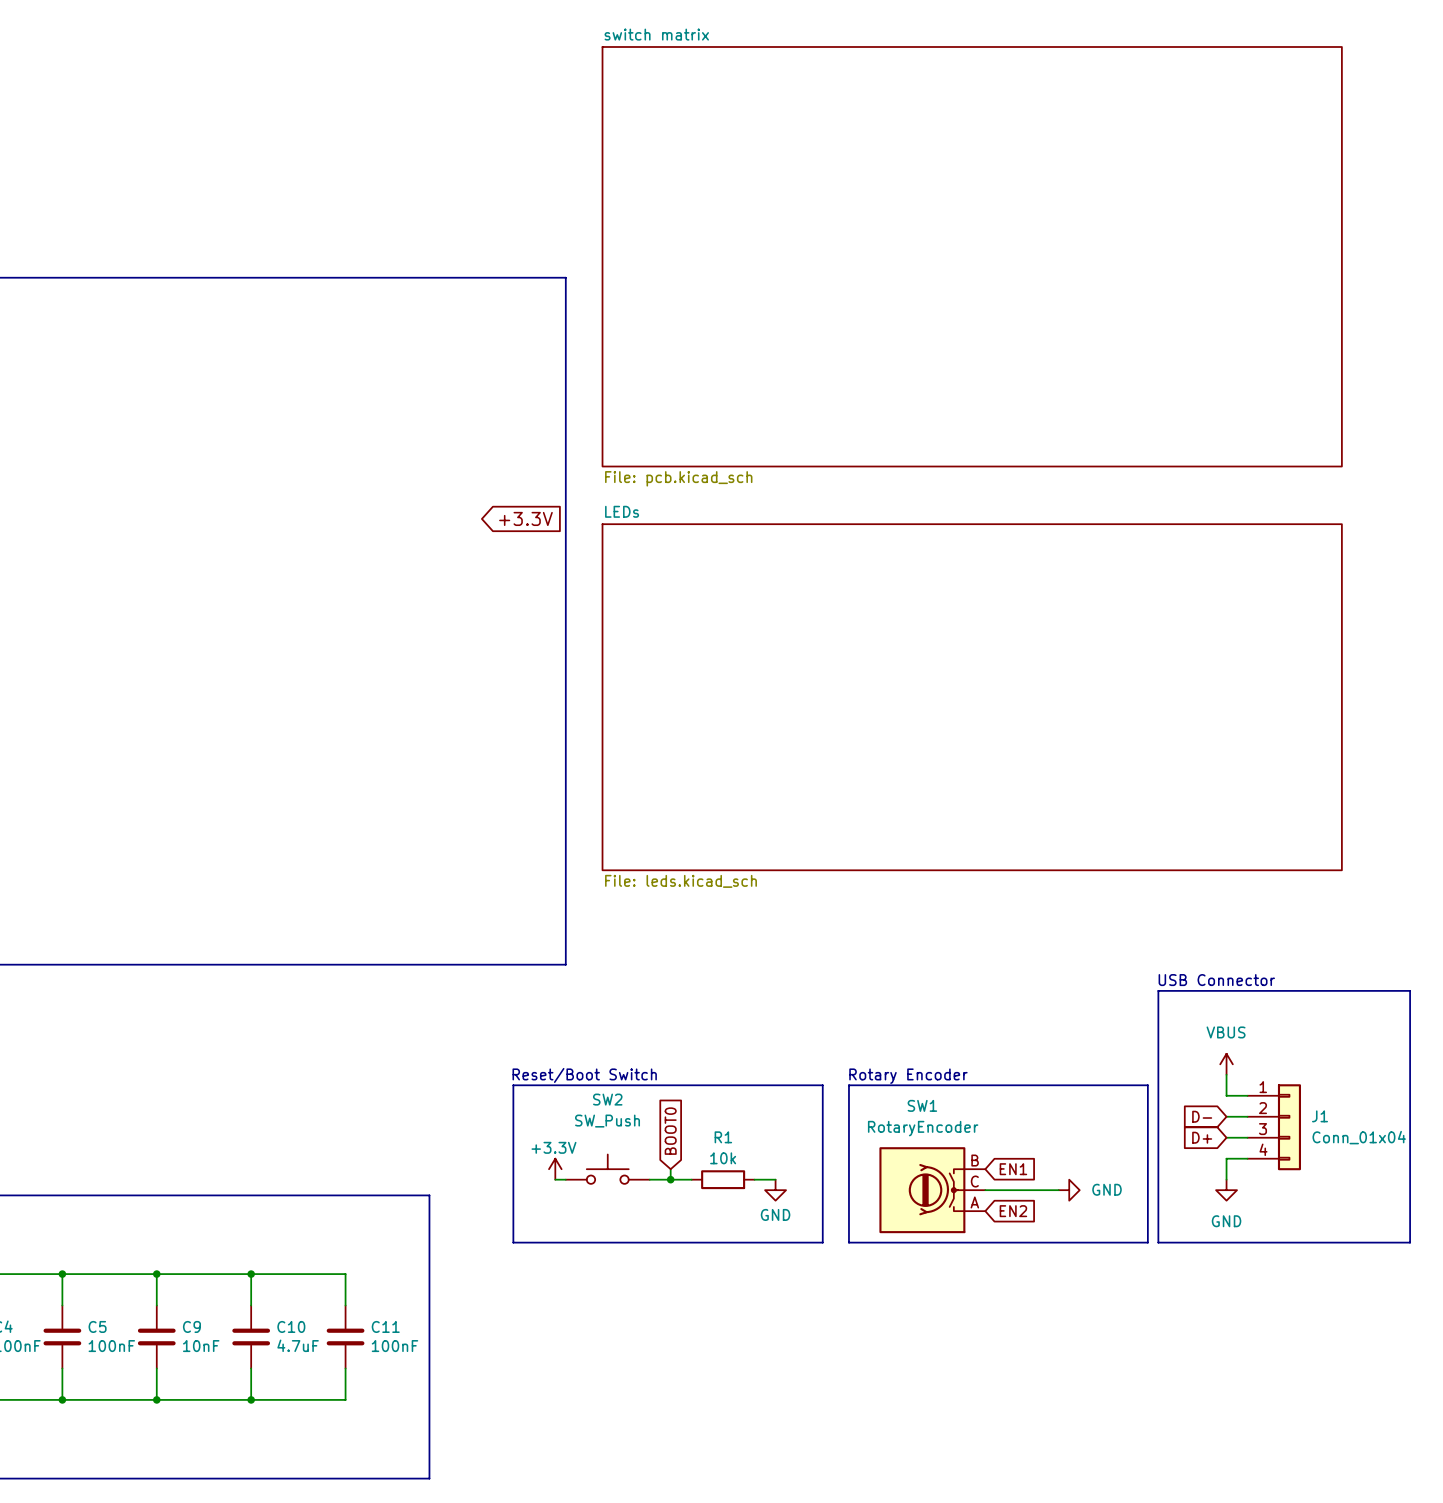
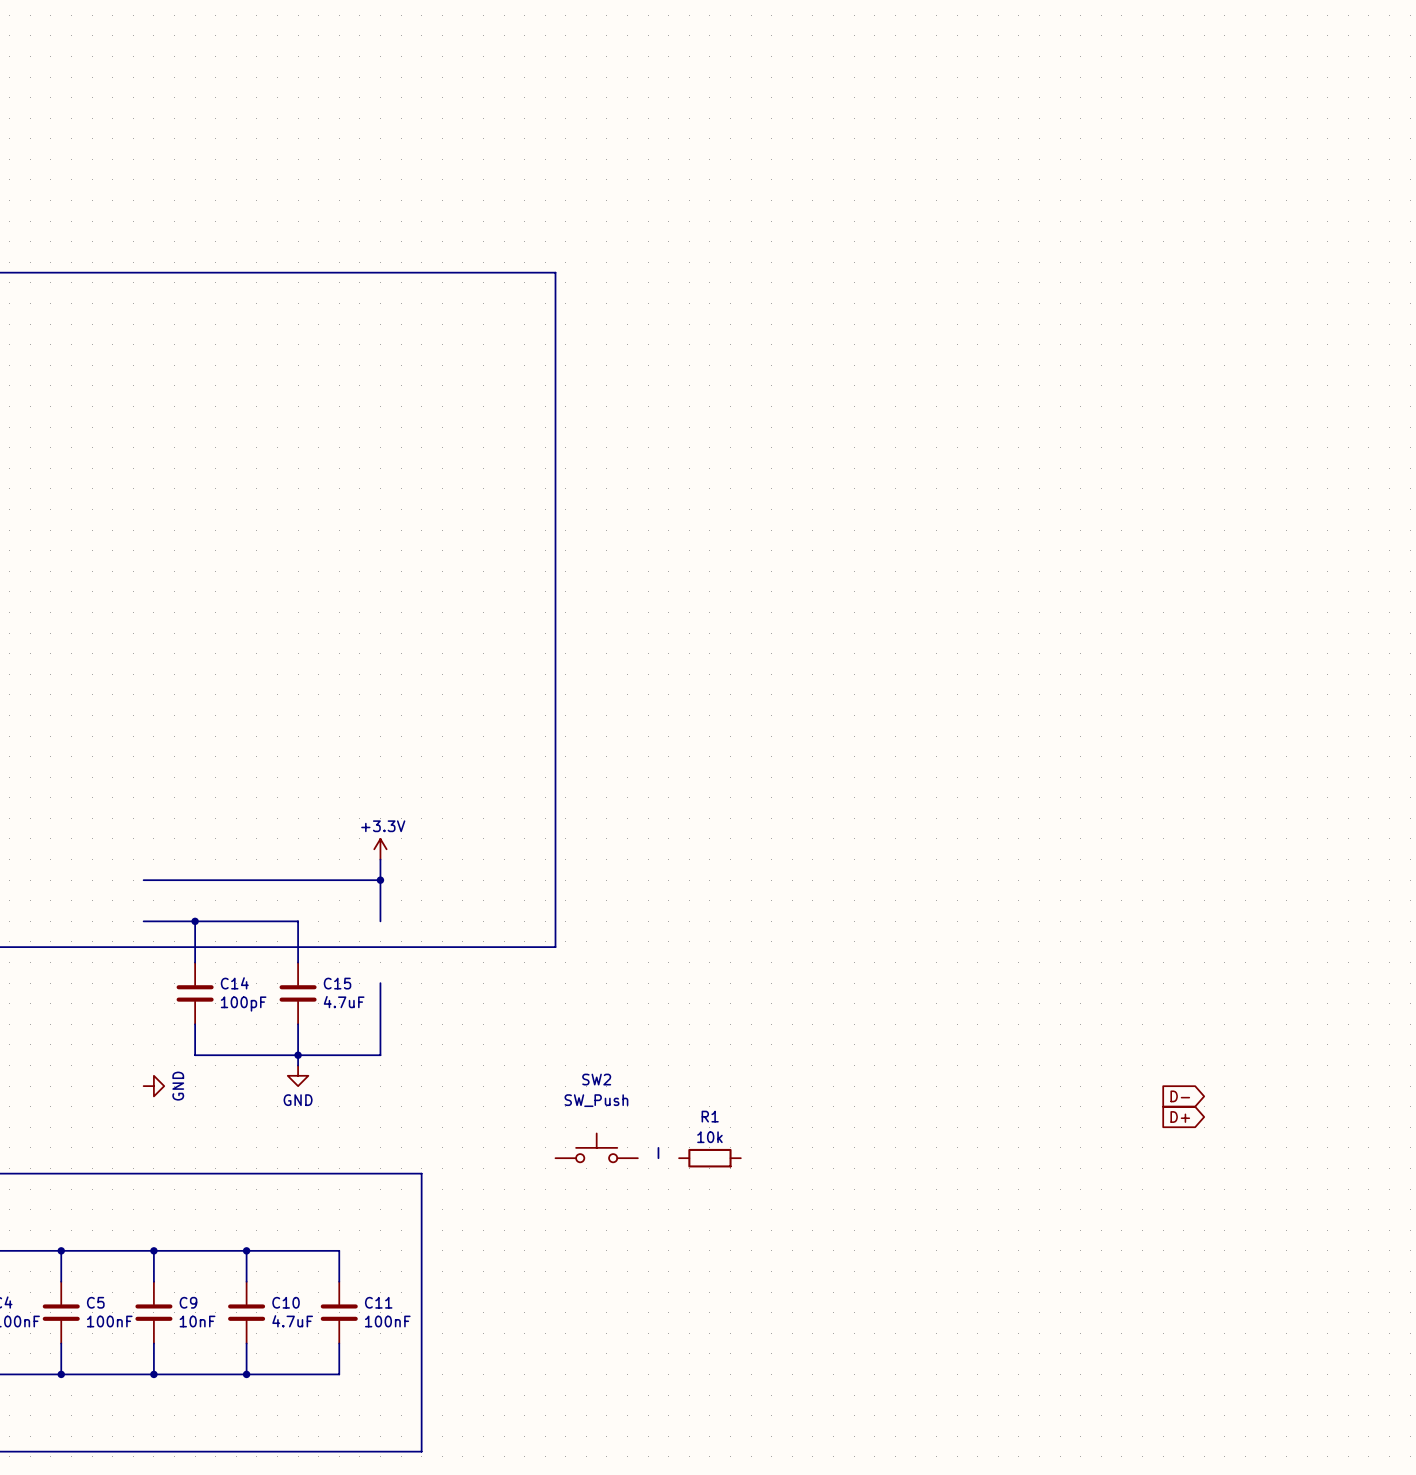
sheet switch matrix: File: pcb.kicad_sch (972, 256) -> none
global label: +3.3V (525, 518) -> none
sheet LEDs: File: leds.kicad_sch (972, 697) -> none
power symbol: none -> +3.3V (380, 849)
wire: none -> (380, 859) (380, 921)
wire: none -> (143, 880) (380, 880)
junction: none -> (380, 880)
wire: none -> (143, 921) (298, 921) (298, 962)
wire: none -> (195, 921) (195, 962)
junction: none -> (195, 921)
text: USB Connector (1216, 980) -> none
line: (1158, 990) (1410, 990) (1410, 1242) (1158, 1242) (1158, 990) -> none
wire: none -> (380, 983) (380, 1055) (195, 1055) (195, 1024)
C14: none -> 100pF (195, 993)
C15: none -> 4.7uF (298, 993)
wire: none -> (298, 1024) (298, 1065)
power symbol: VBUS (1226, 1064) -> none
junction: none -> (298, 1055)
wire: (1226, 1074) (1226, 1095) (1247, 1095) -> none
text: Reset/Boot Switch (584, 1075) -> none
text: Rotary Encoder (908, 1076) -> none
line: (513, 1085) (822, 1085) (822, 1242) (513, 1242) (513, 1085) -> none
line: (848, 1085) (1147, 1085) (1147, 1242) (848, 1242) (848, 1085) -> none
power symbol: none -> GND (298, 1075)
power symbol: none -> GND (153, 1086)
wire: (1226, 1116) (1247, 1116) -> none
J1: Conn_01x04 (1274, 1127) -> none
global label: BOOT0 (670, 1131) -> none
wire: (1226, 1137) (1247, 1137) -> none
wire: (1247, 1158) (1226, 1158) (1226, 1179) -> none
power symbol: +3.3V (555, 1169) -> none
global label: EN1 (1013, 1169) -> none
wire: (555, 1179) (565, 1179) -> none
wire: (649, 1179) (691, 1179) -> none
junction: (670, 1179) -> none
wire: (754, 1179) (775, 1179) -> none
power symbol: GND (775, 1190) -> none
SW1: RotaryEncoder (932, 1190) -> none
wire: (985, 1190) (1058, 1190) -> none
power symbol: GND (1069, 1190) -> none
power symbol: GND (1226, 1190) -> none
global label: EN2 (1013, 1211) -> none

